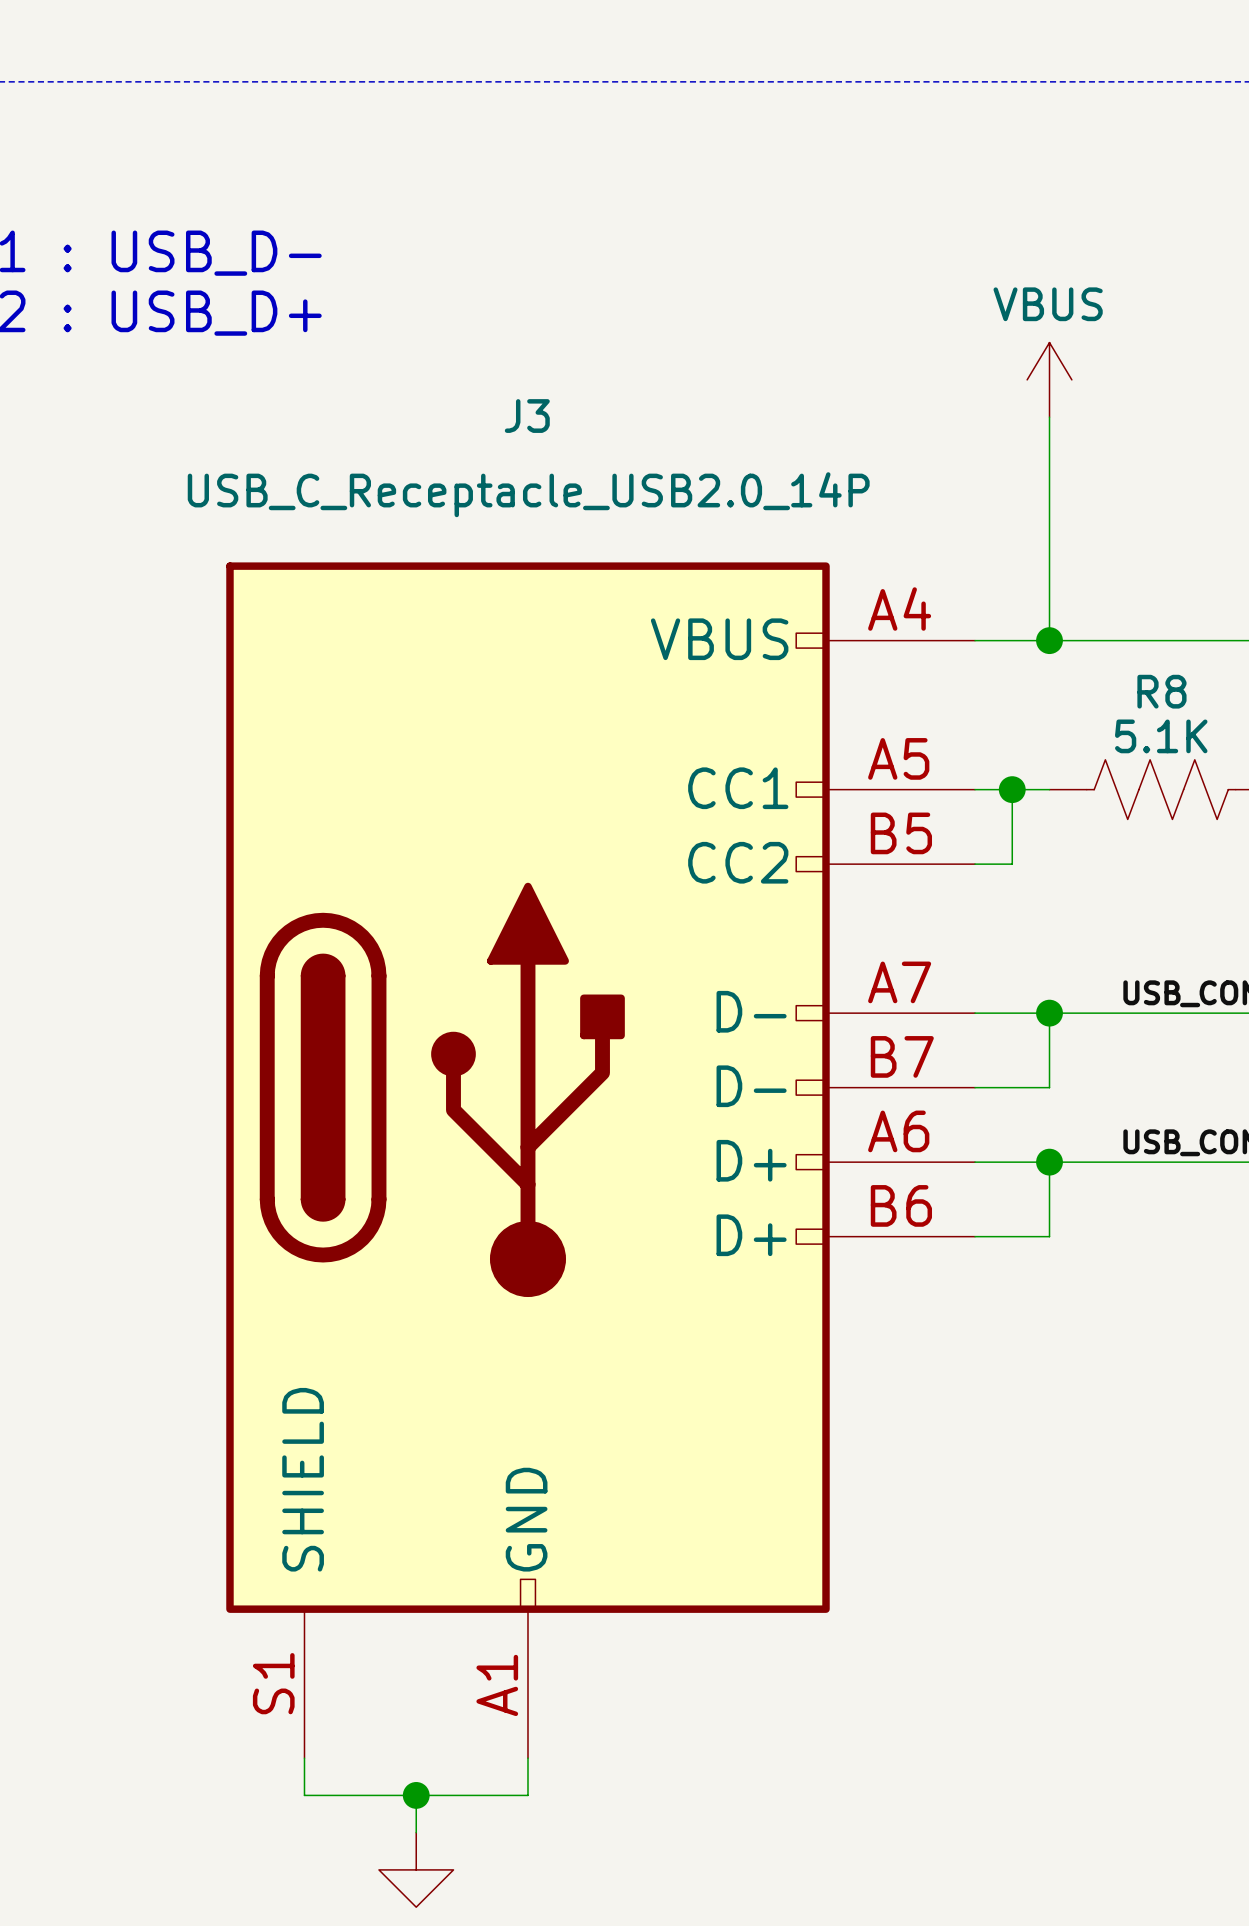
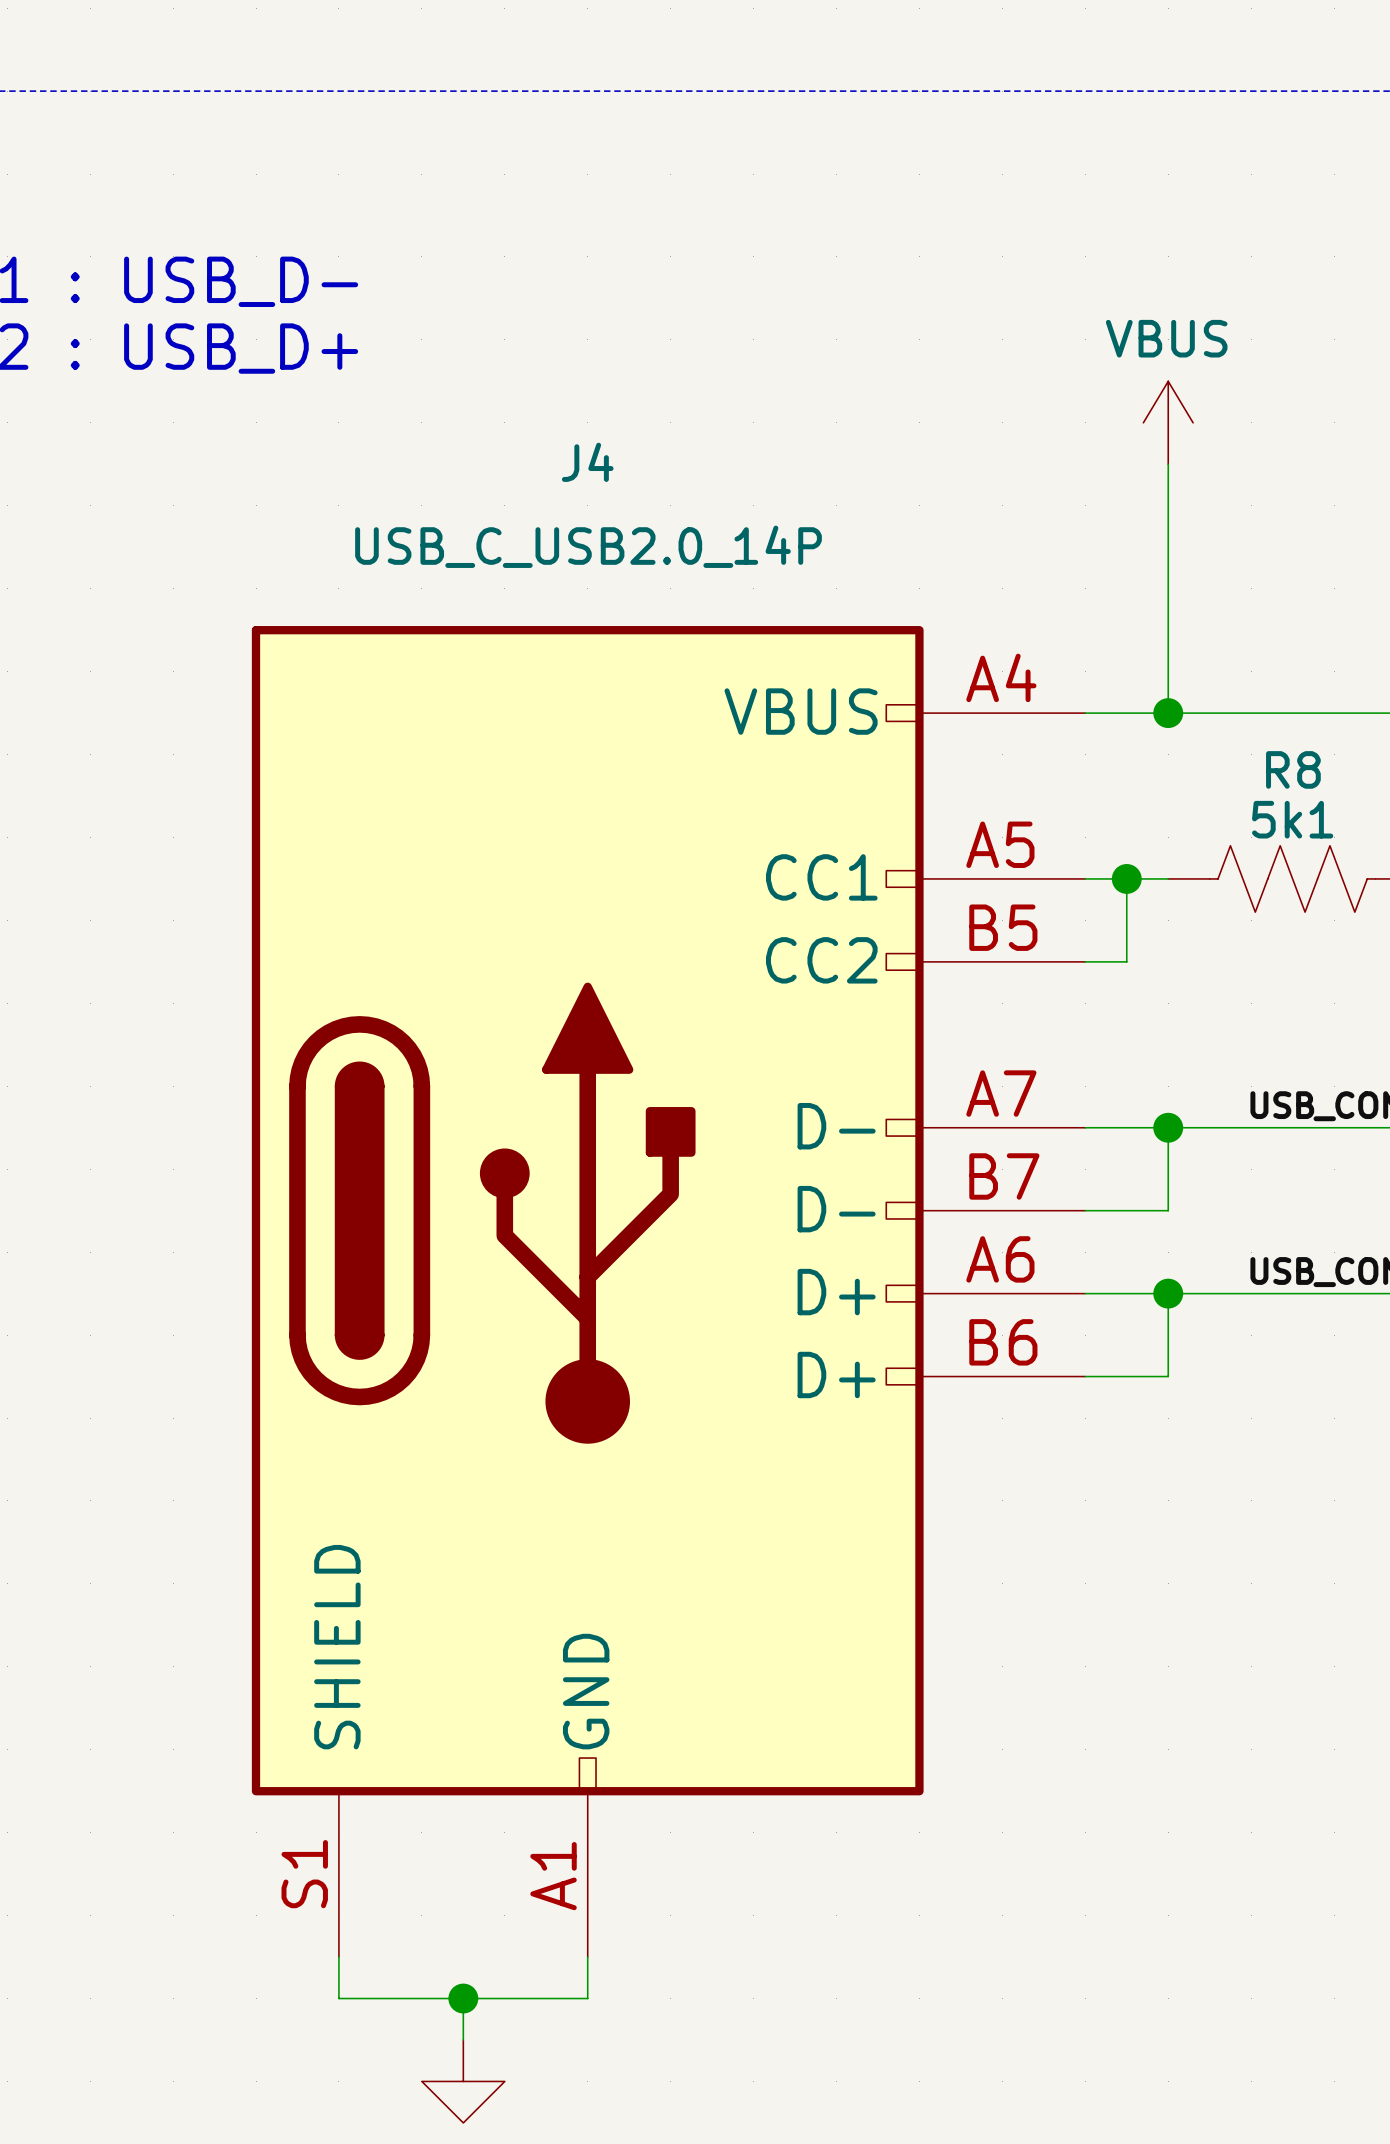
J3 name: J3 (527, 416) -> J4 (587, 462)
J3 value: USB_C_Receptacle_USB2.0_14P (528, 494) -> USB_C_USB2.0_14P (588, 546)
R8 value: 5.1K (1161, 736) -> 5k1 (1292, 819)

